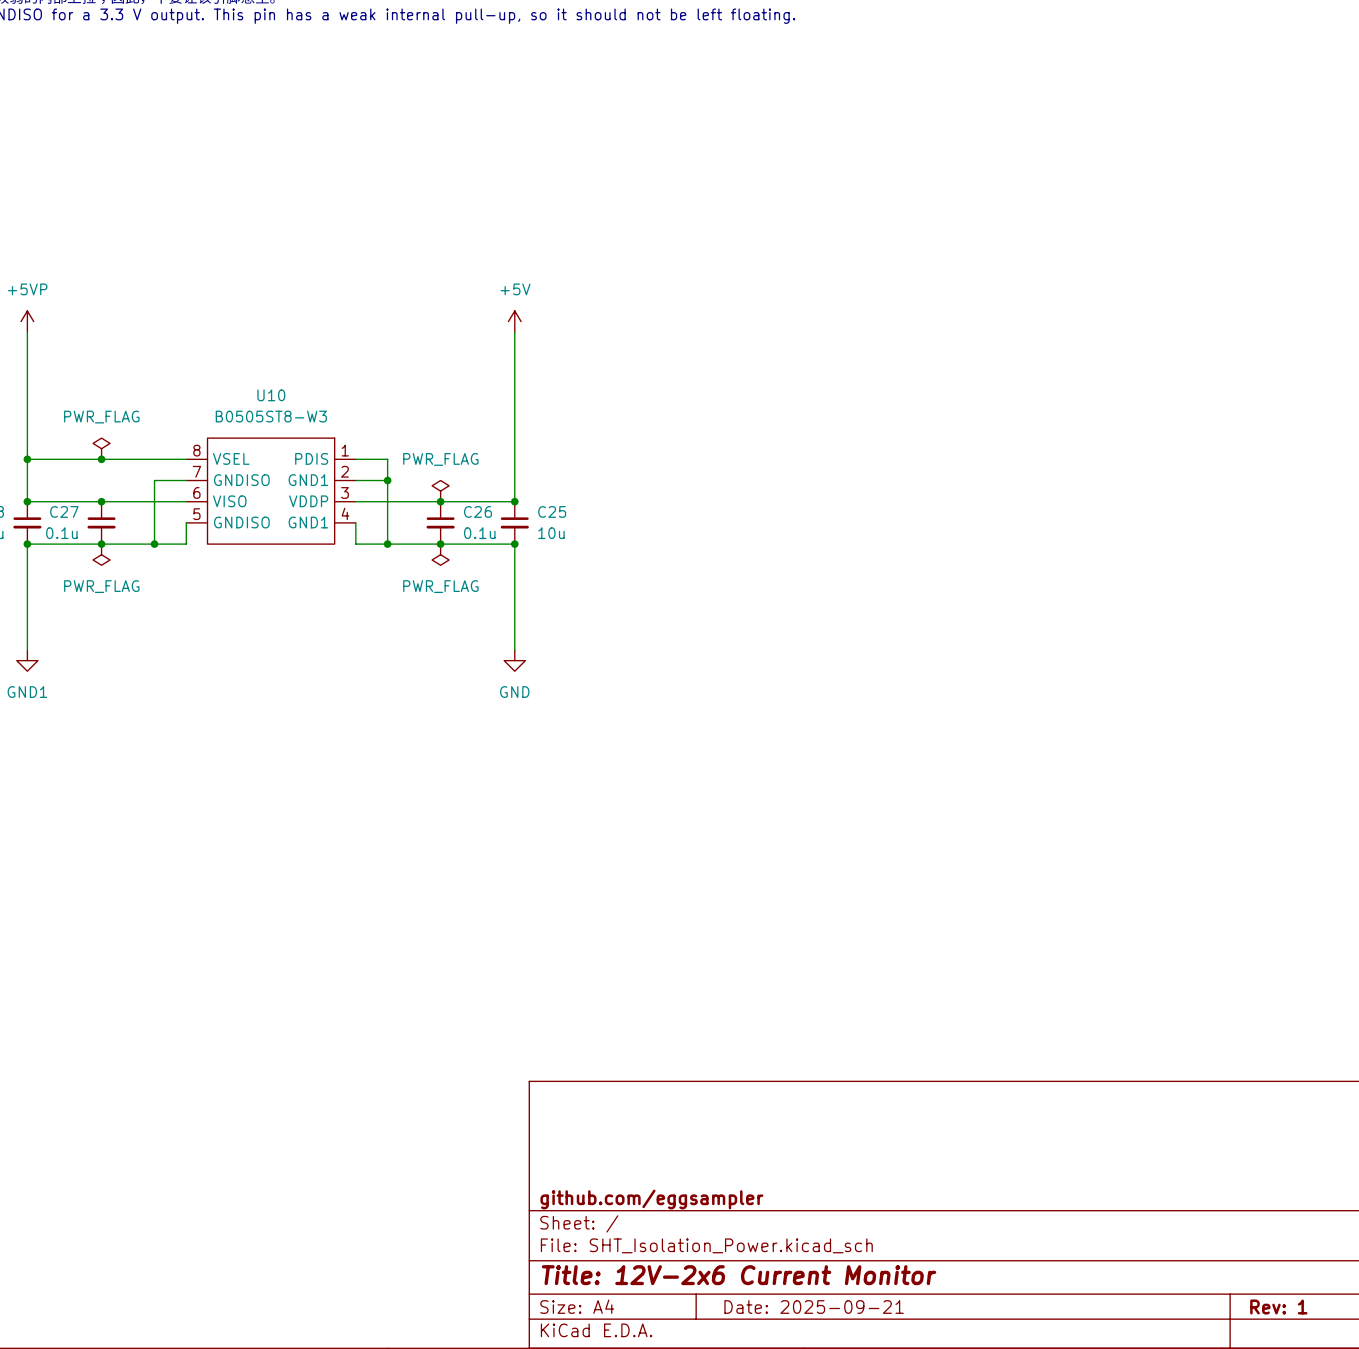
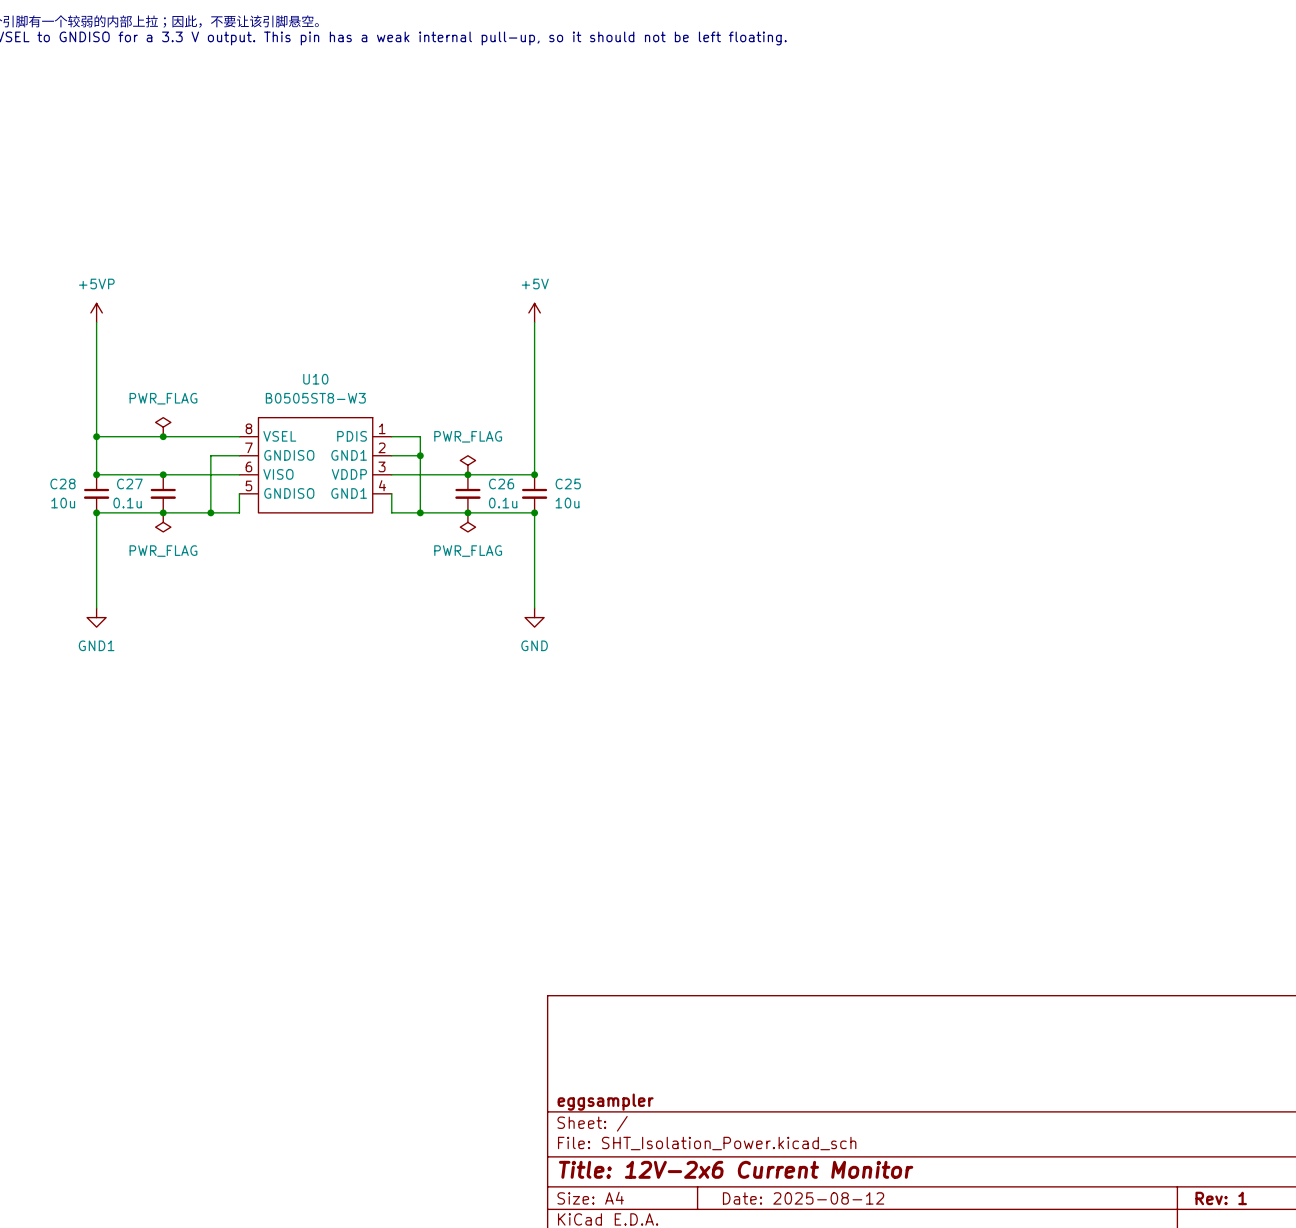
title block: github.com/eggsampler (651, 1199) -> eggsampler (605, 1102)
title block: Date: 2025-09-21 (814, 1307) -> Date: 2025-08-12 (803, 1198)

